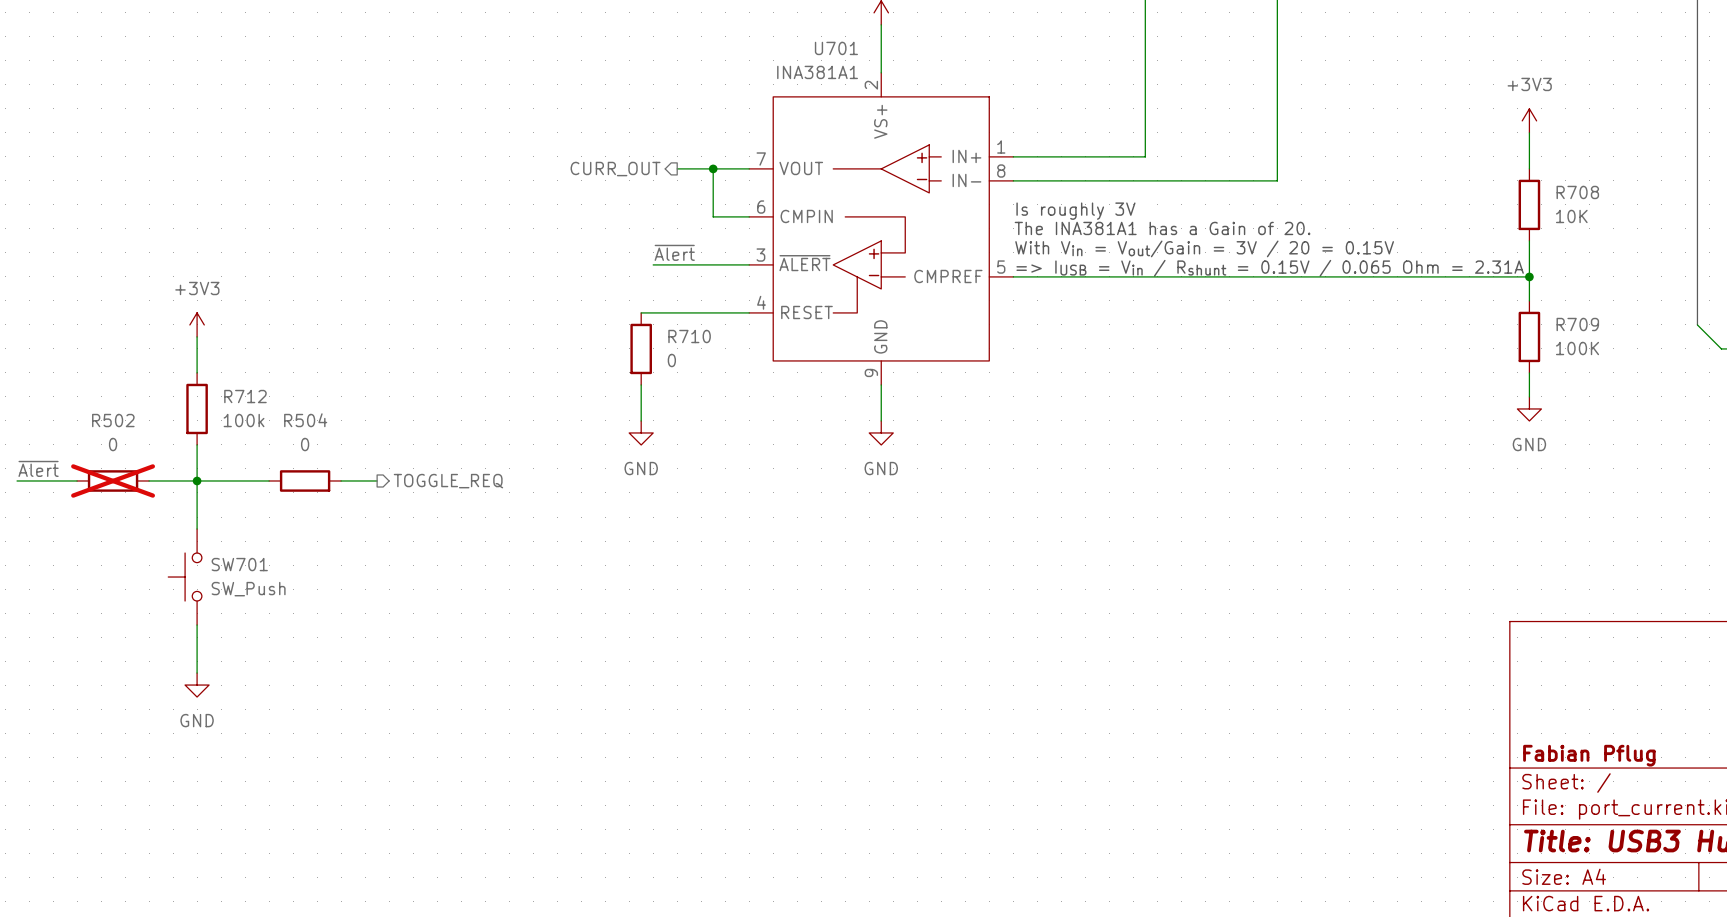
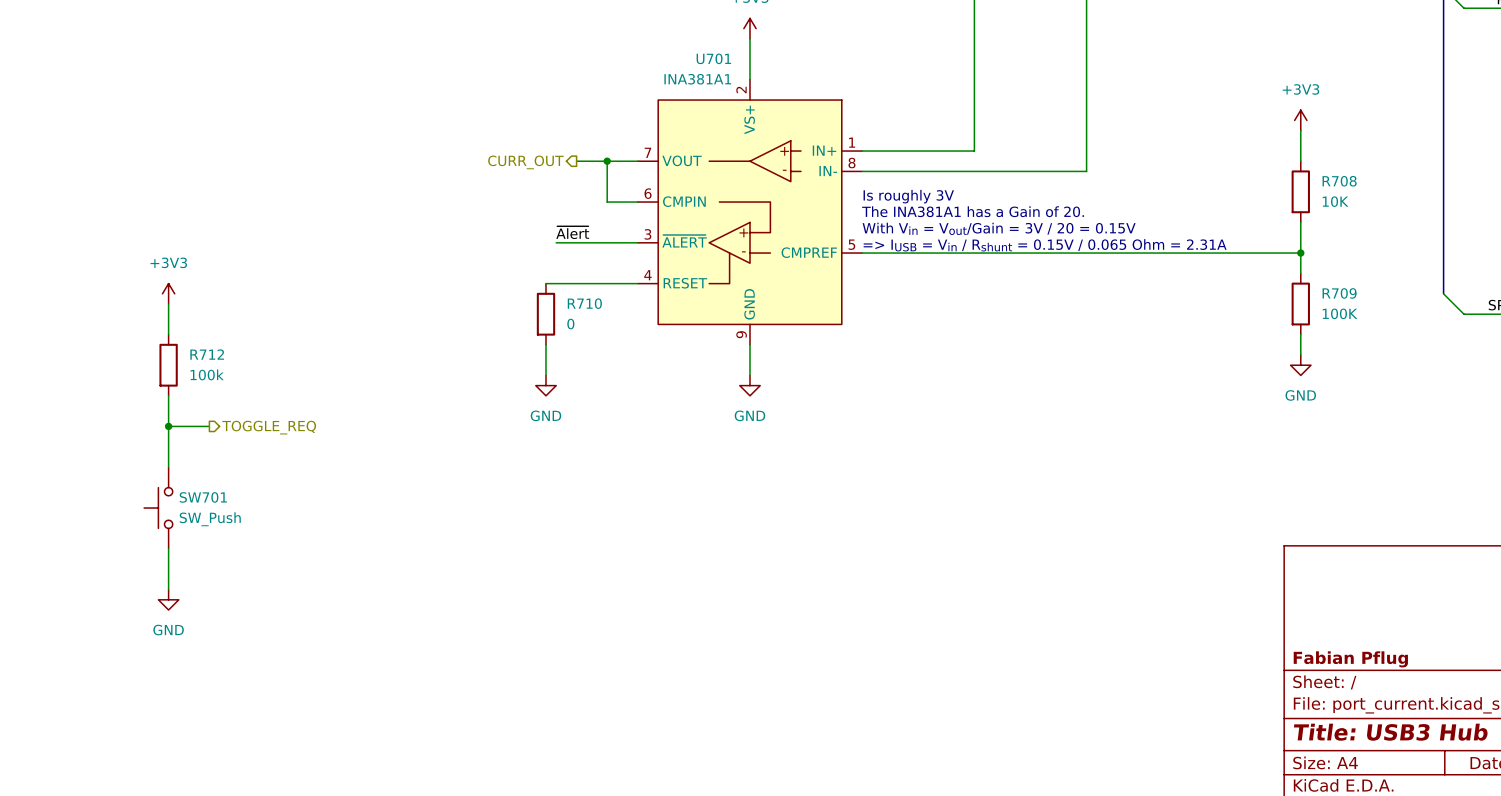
label: ~{Alert} (38, 468) -> none
wire: (17, 480) (77, 480) -> none
R502: 0 (113, 480) -> none
wire: (149, 480) (197, 480) -> none
wire: (245, 480) (269, 480) -> none
R504: 0 (305, 480) -> none
wire: (341, 480) (377, 480) -> none
hierarchical label position: TOGGLE_REQ (448, 481) -> TOGGLE_REQ (269, 427)

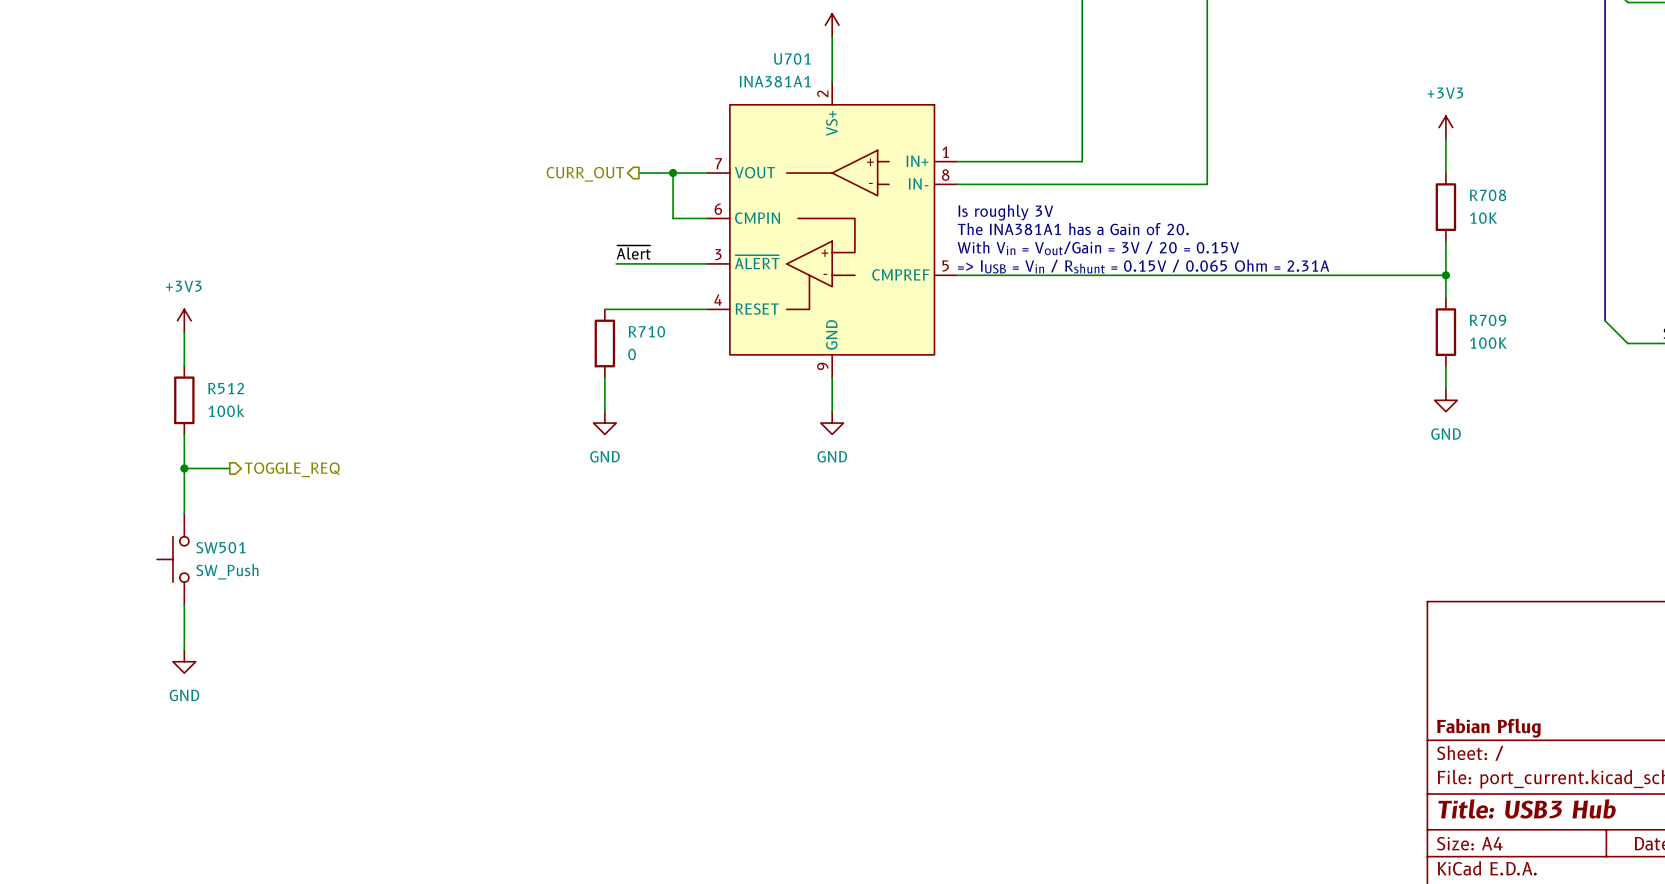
R712 name: R712 (207, 354) -> R512 (226, 388)
SW701 name: SW701 (203, 497) -> SW501 (220, 547)

